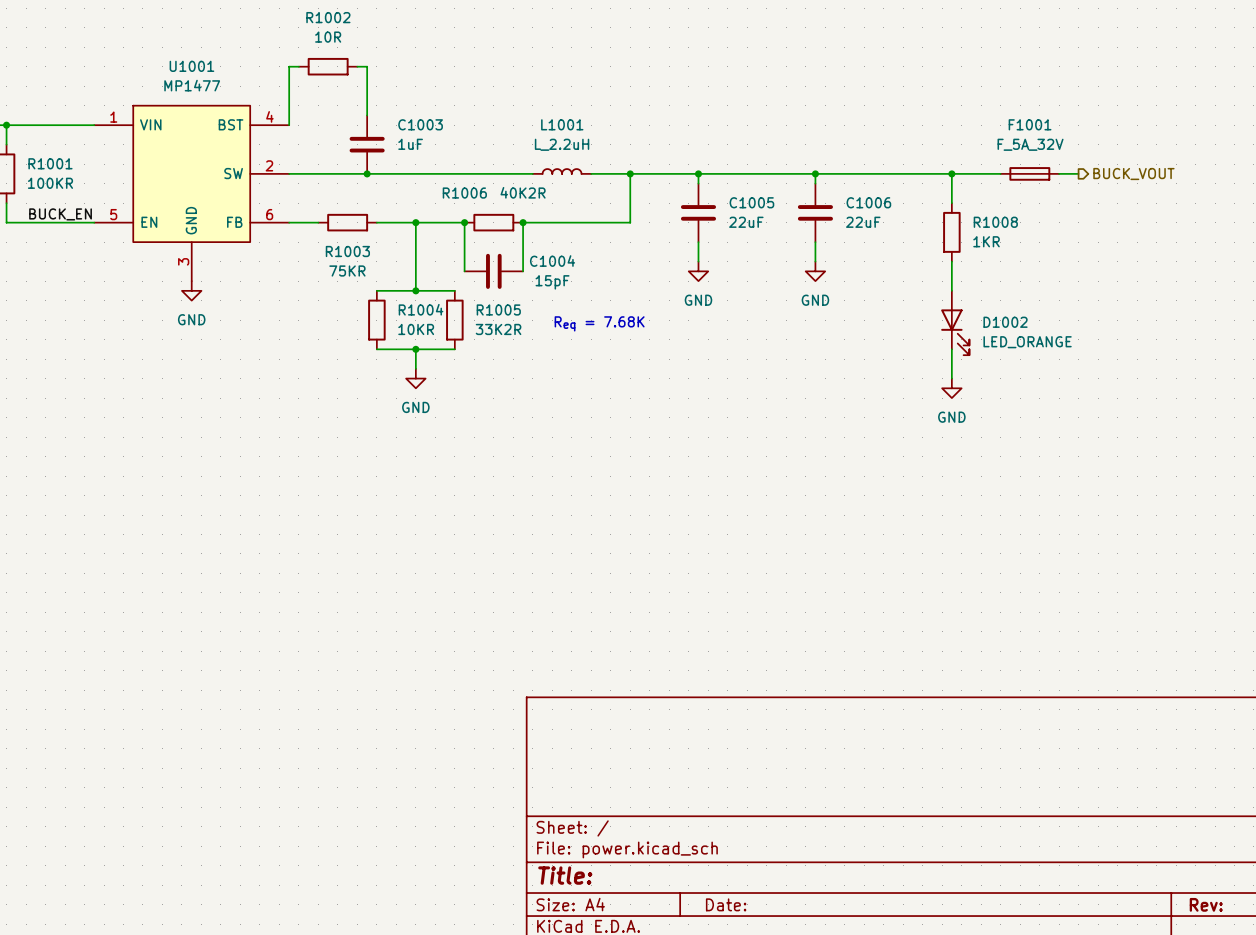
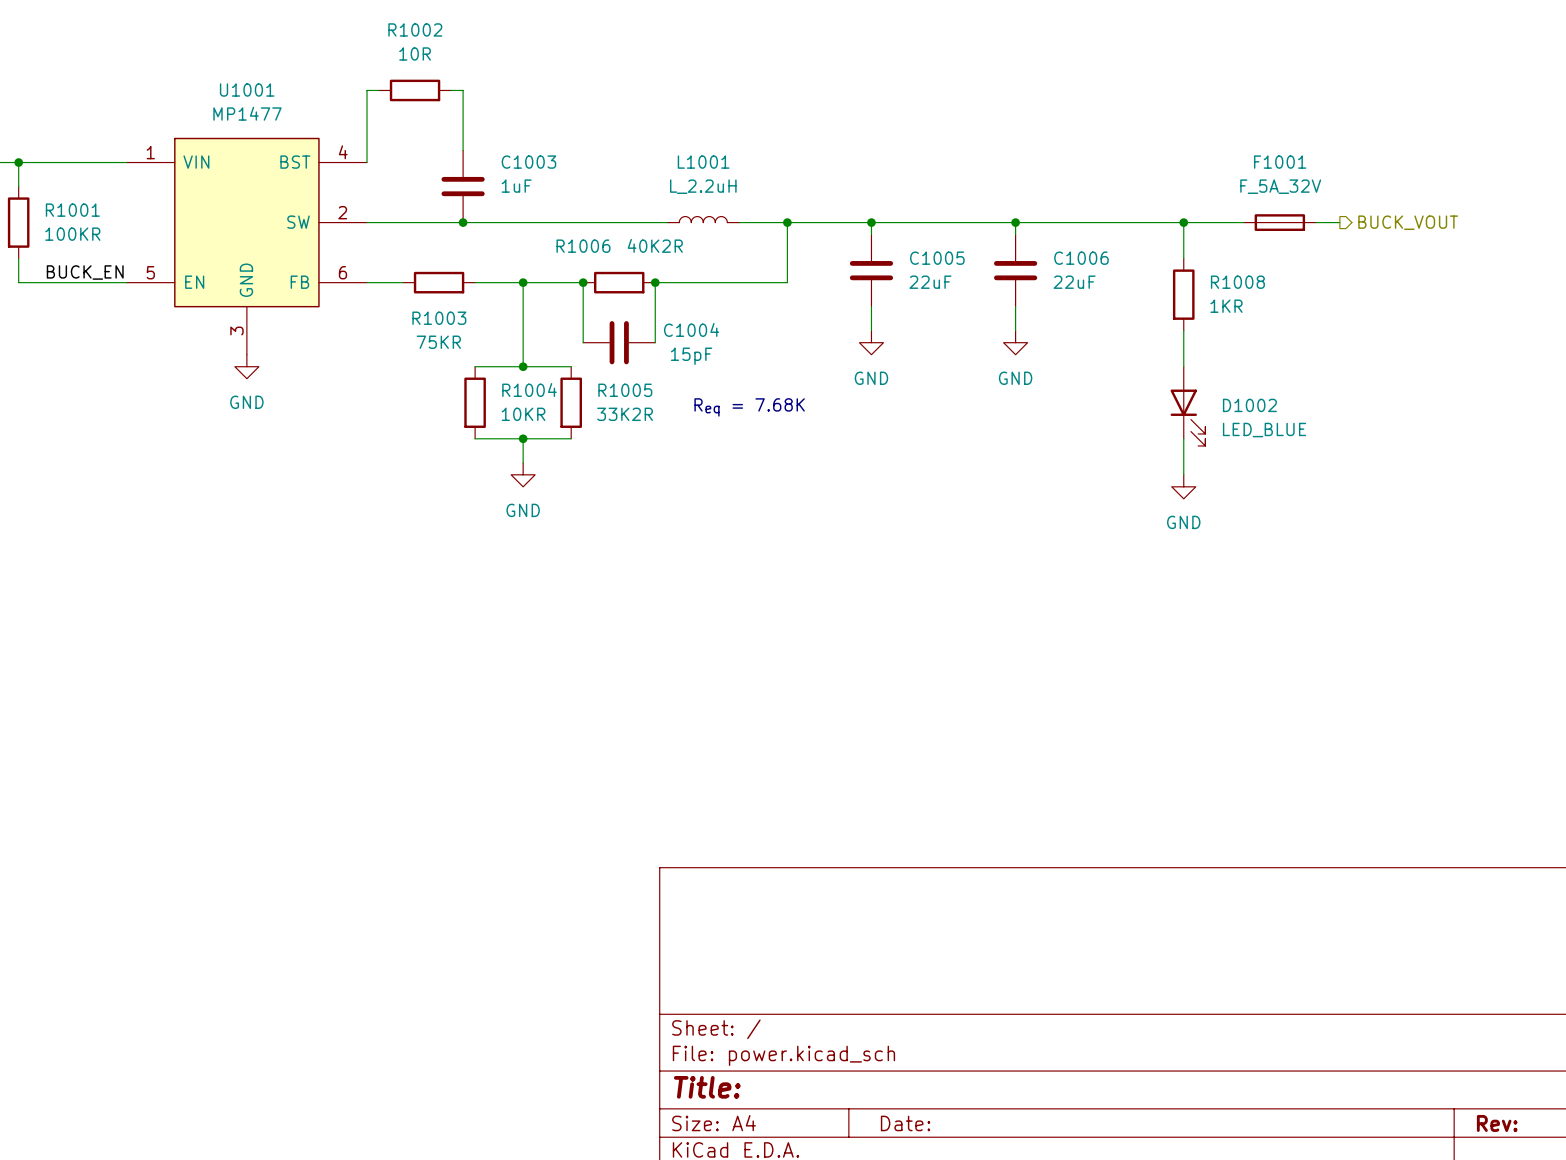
D1002 value: LED_ORANGE (1027, 342) -> LED_BLUE (1264, 430)

